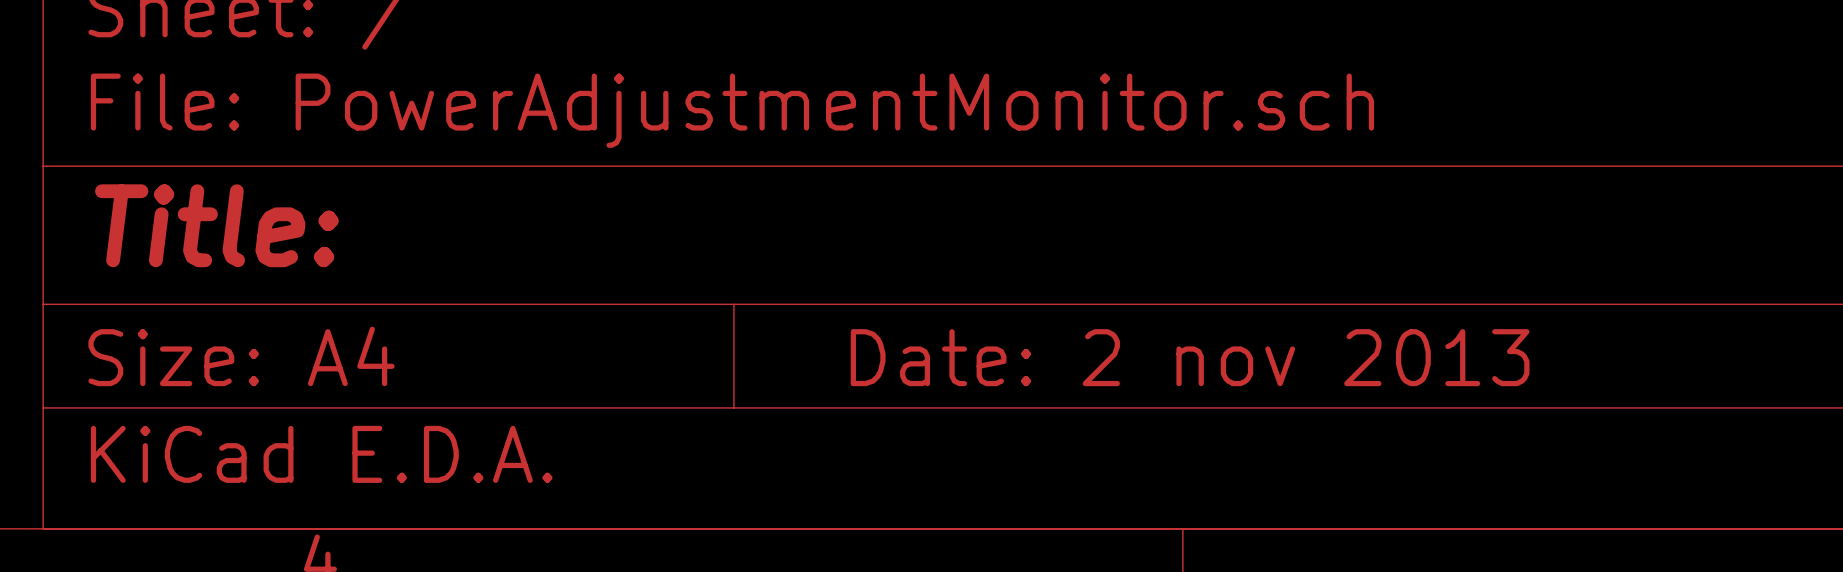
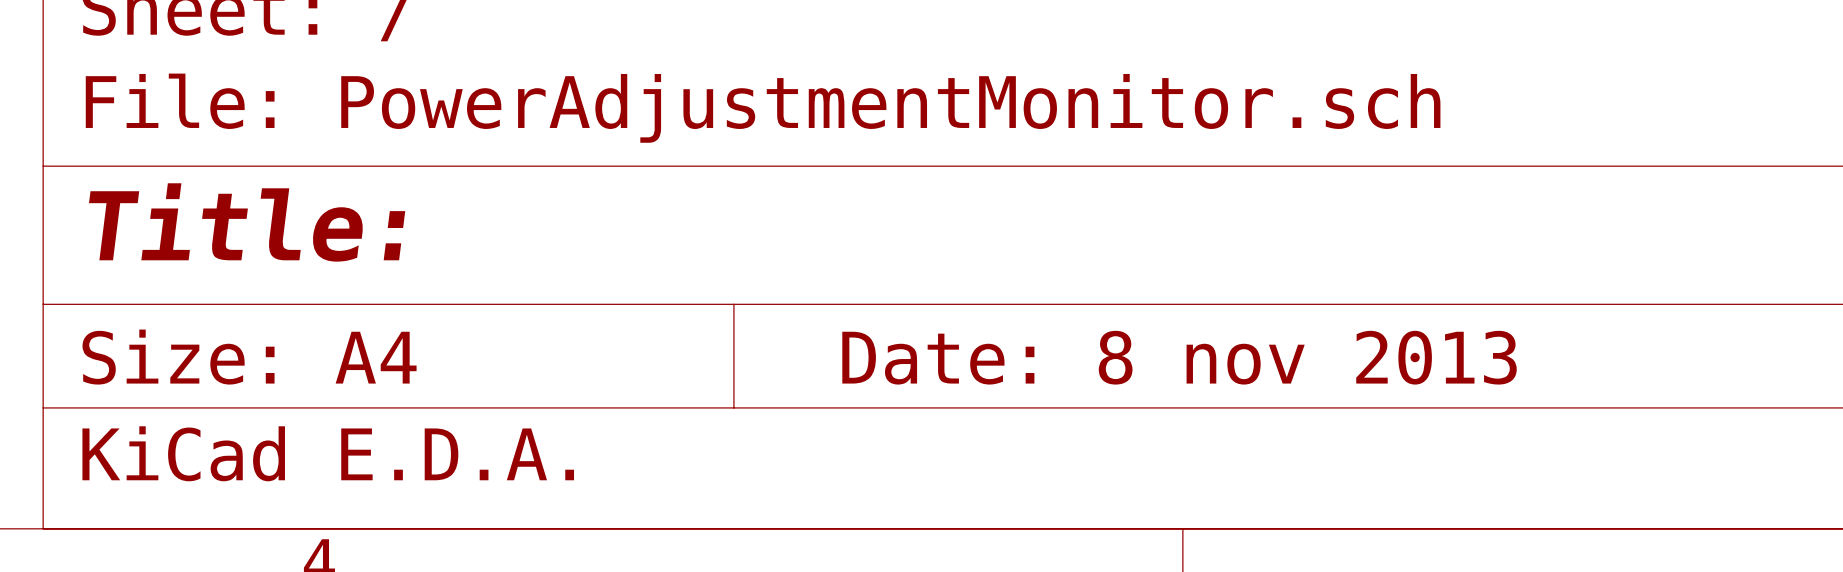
title block: Date: 2 nov 2013 (1190, 357) -> Date: 8 nov 2013 (1179, 357)

